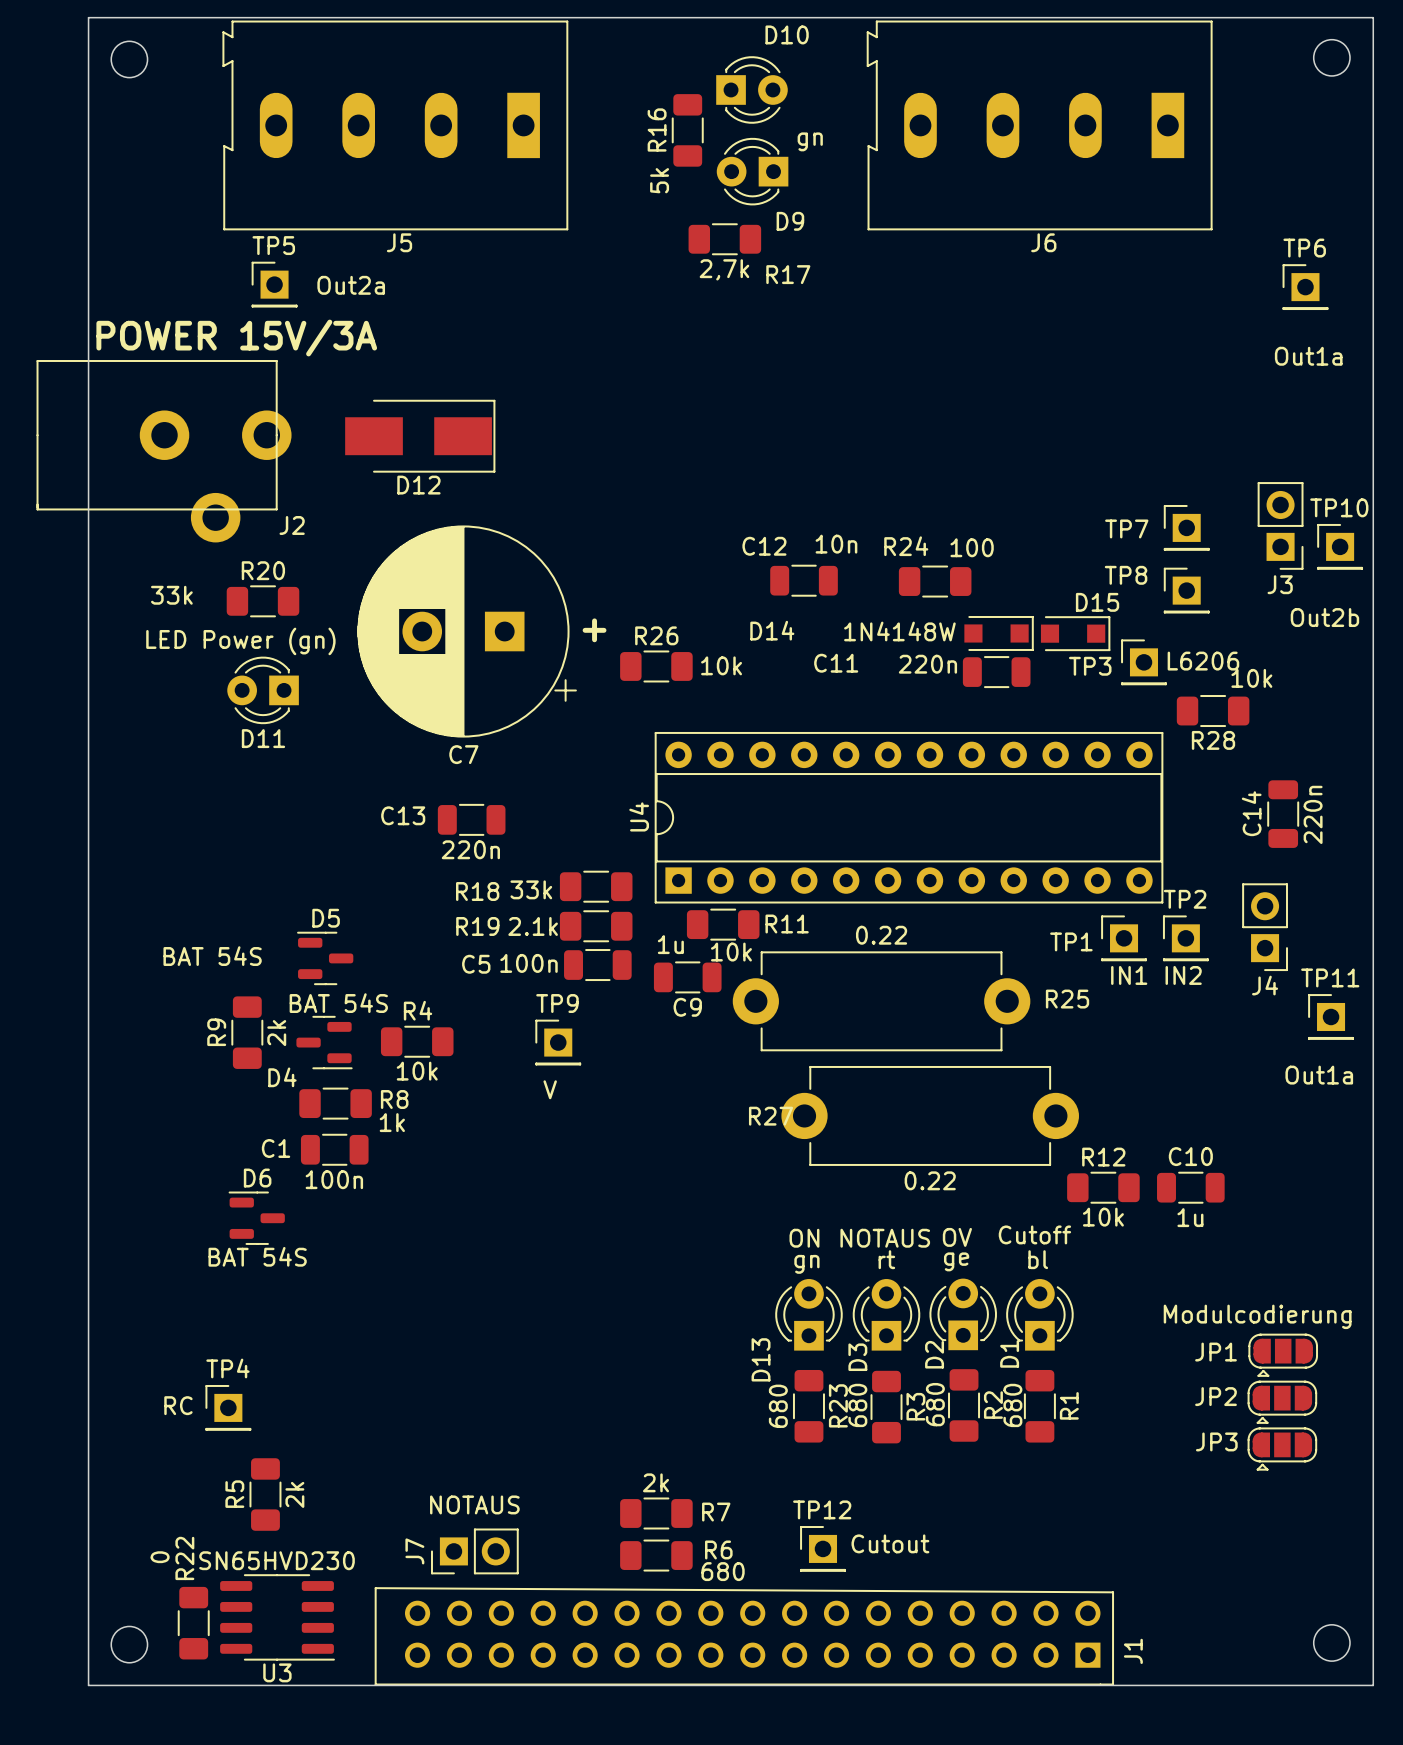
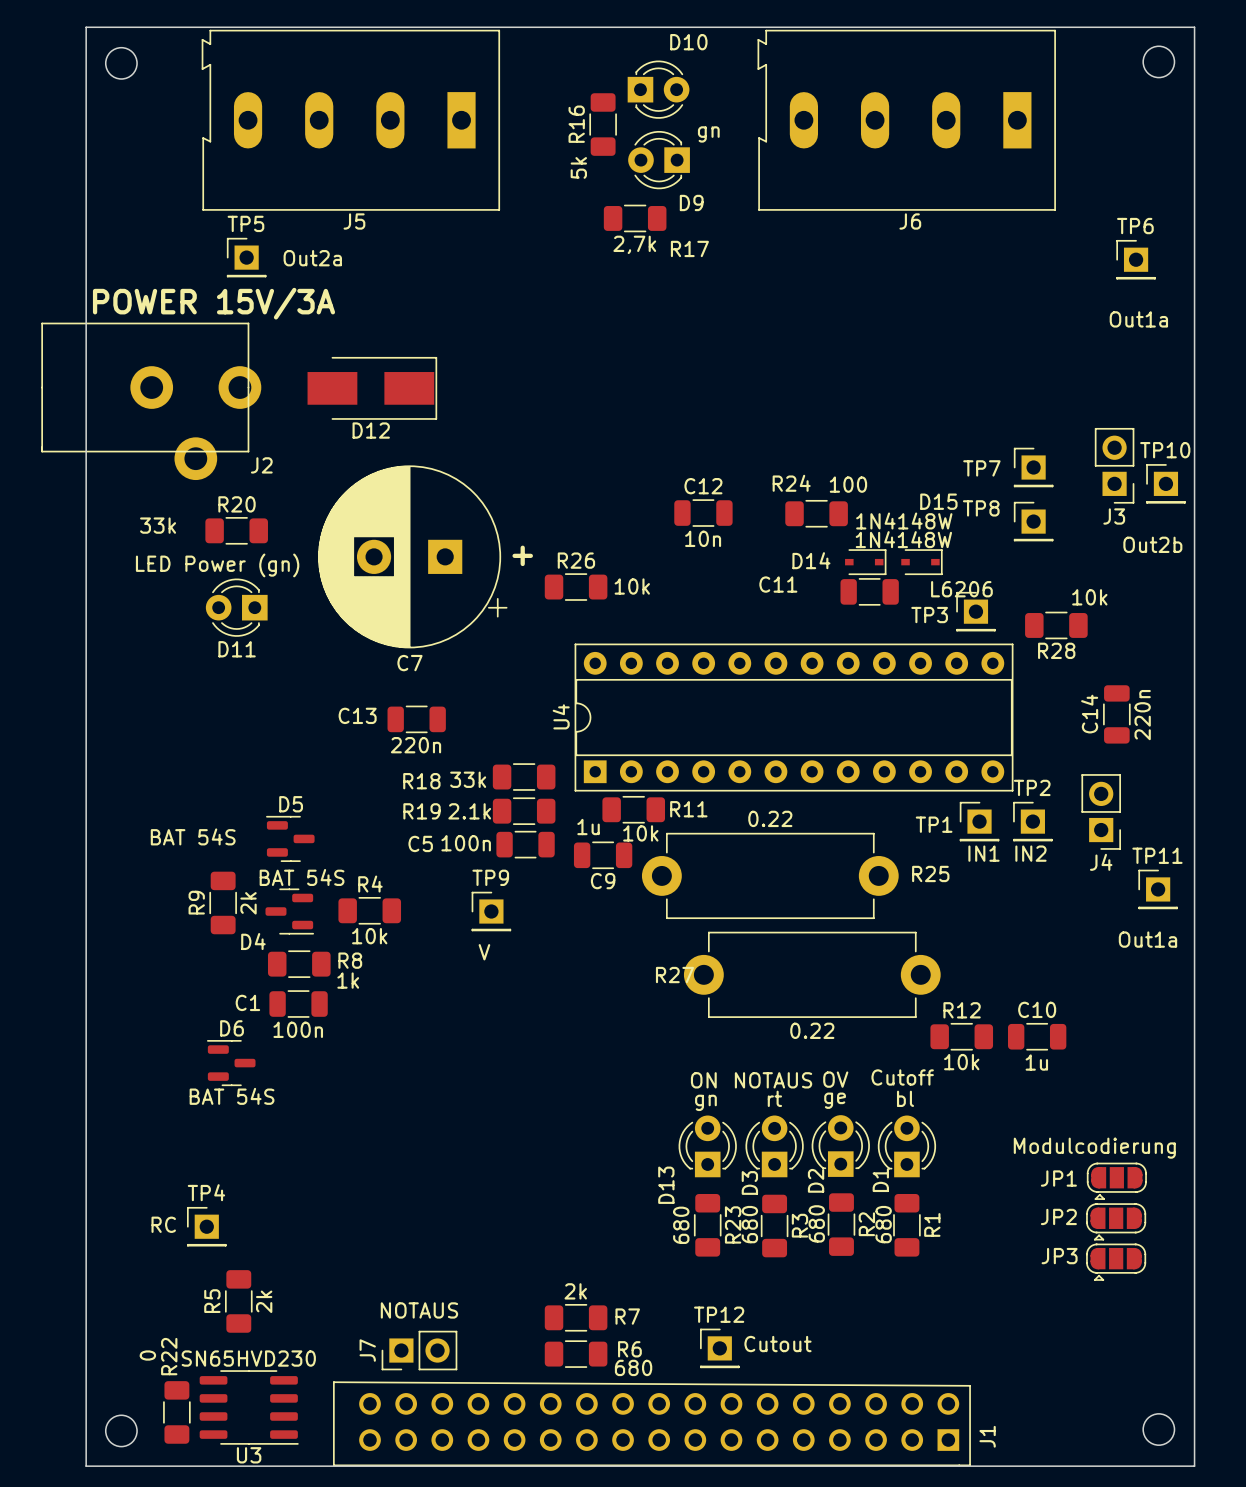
C12 value position: 10n (836, 544) -> 10n (703, 538)
C12 name position: C12 (764, 546) -> C12 (703, 486)
D15 value: none -> 1N4148W (904, 520)
D15 name position: D15 (1097, 602) -> D15 (938, 501)
D14 footprint: [964, 616, 1034, 651] -> [845, 549, 887, 576]
D15 footprint: [1040, 616, 1111, 652] -> [901, 549, 943, 576]
D14 name position: D14 (772, 630) -> D14 (811, 560)
D14 value position: 1N4148W (899, 631) -> 1N4148W (903, 539)
text position: L6206 (1203, 661) -> L6206 (961, 589)
TP3 position: (1143, 662) -> (975, 611)
C11 name position: C11 (836, 663) -> C11 (778, 584)
C11 value: 220n (927, 664) -> none

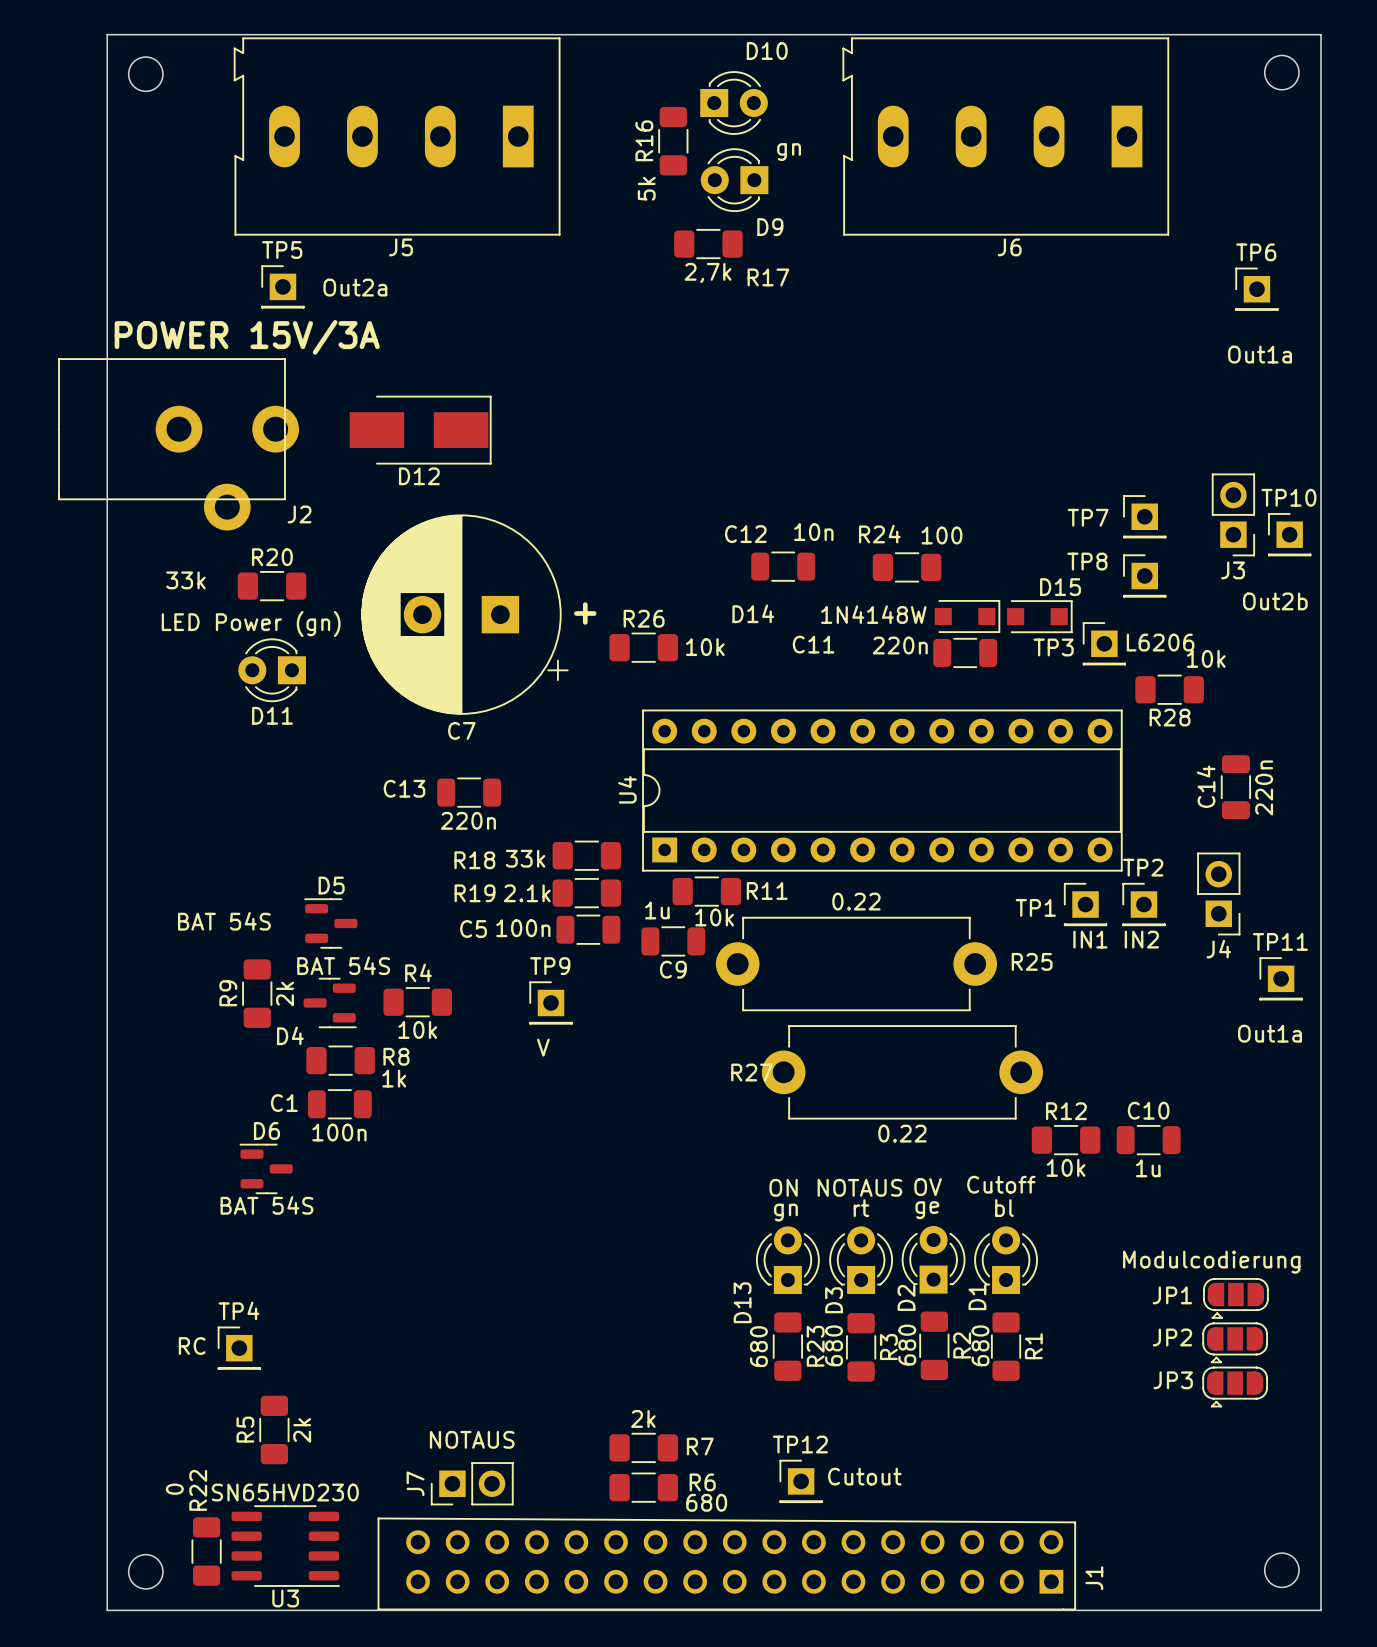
C12 name position: C12 (703, 486) -> C12 (745, 534)
D15 name position: D15 (938, 501) -> D15 (1060, 587)
D15 value: 1N4148W (904, 520) -> none
C12 value position: 10n (703, 538) -> 10n (813, 532)
D14 value position: 1N4148W (903, 539) -> 1N4148W (873, 614)
D14 footprint: [845, 549, 887, 576] -> [934, 599, 1001, 634]
D15 footprint: [901, 549, 943, 576] -> [1007, 600, 1073, 634]
D14 name position: D14 (811, 560) -> D14 (753, 613)
C11 name position: C11 (778, 584) -> C11 (813, 644)
C11 value: none -> 220n (900, 645)
text position: L6206 (961, 589) -> L6206 (1160, 642)
TP3 position: (975, 611) -> (1104, 643)

